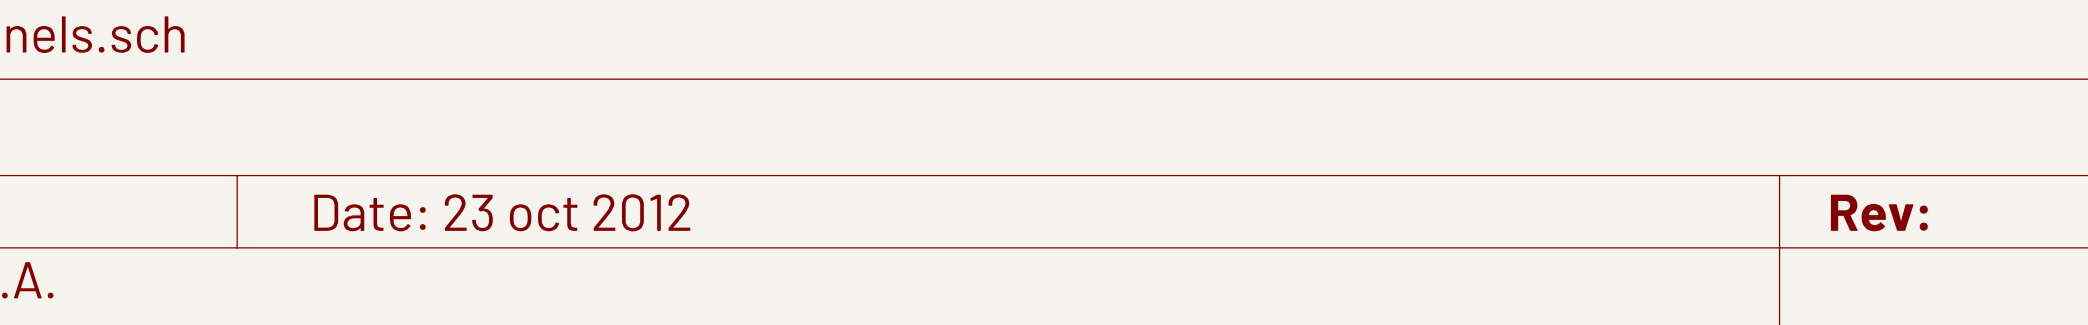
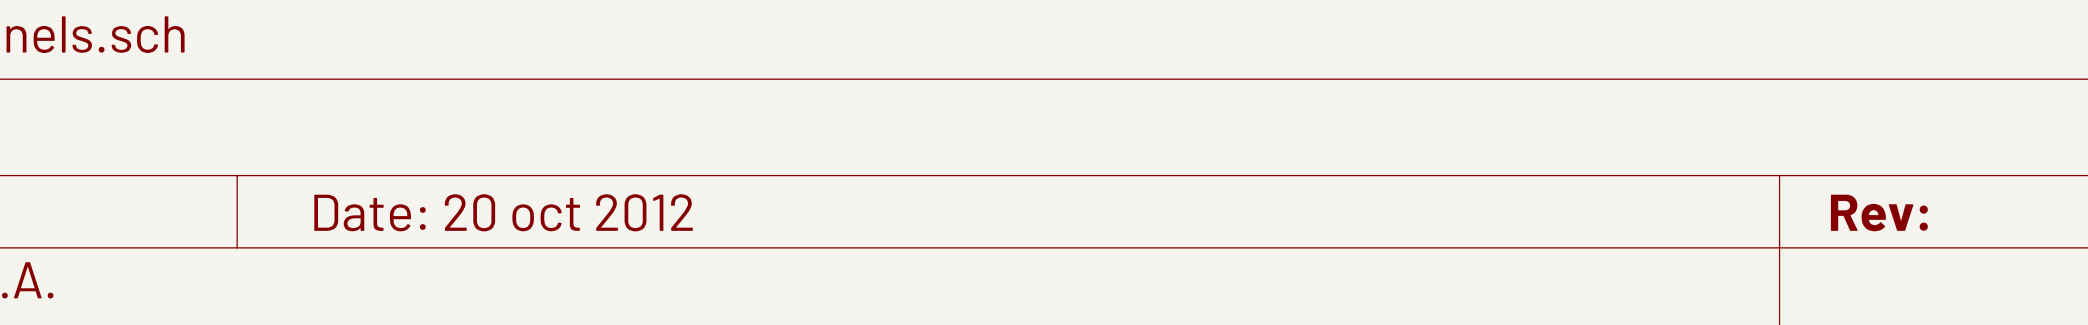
title block: Date: 23 oct 2012 (502, 212) -> Date: 20 oct 2012 (503, 212)

